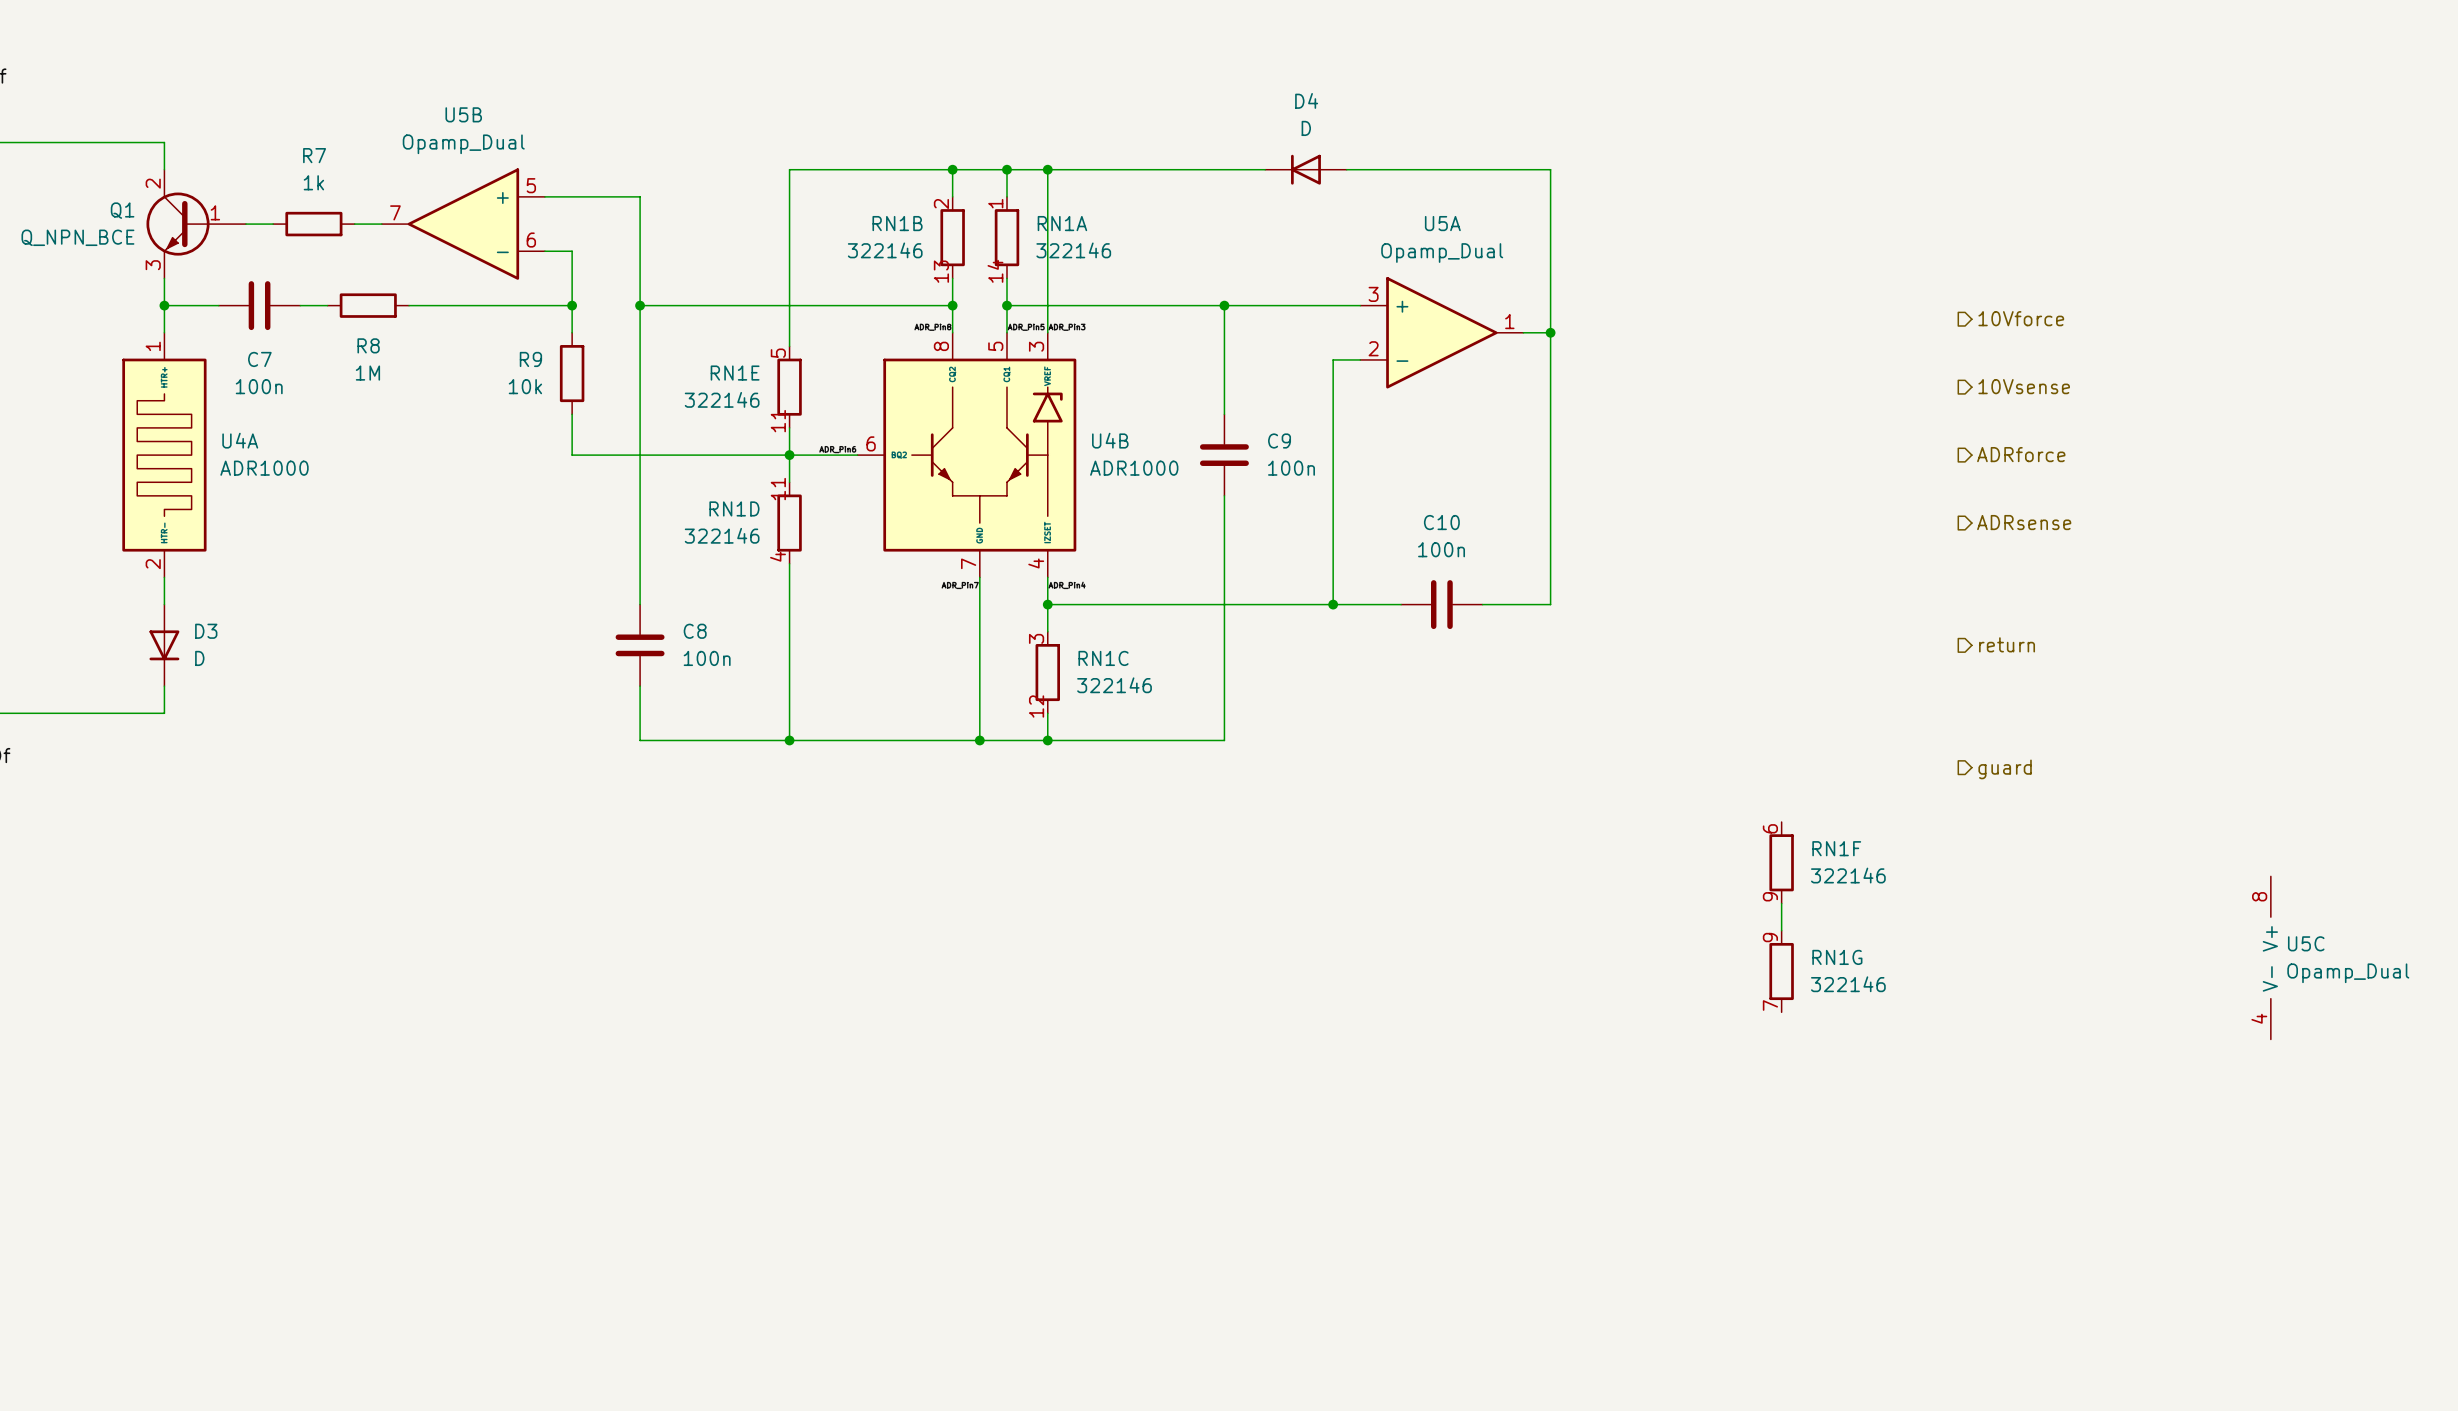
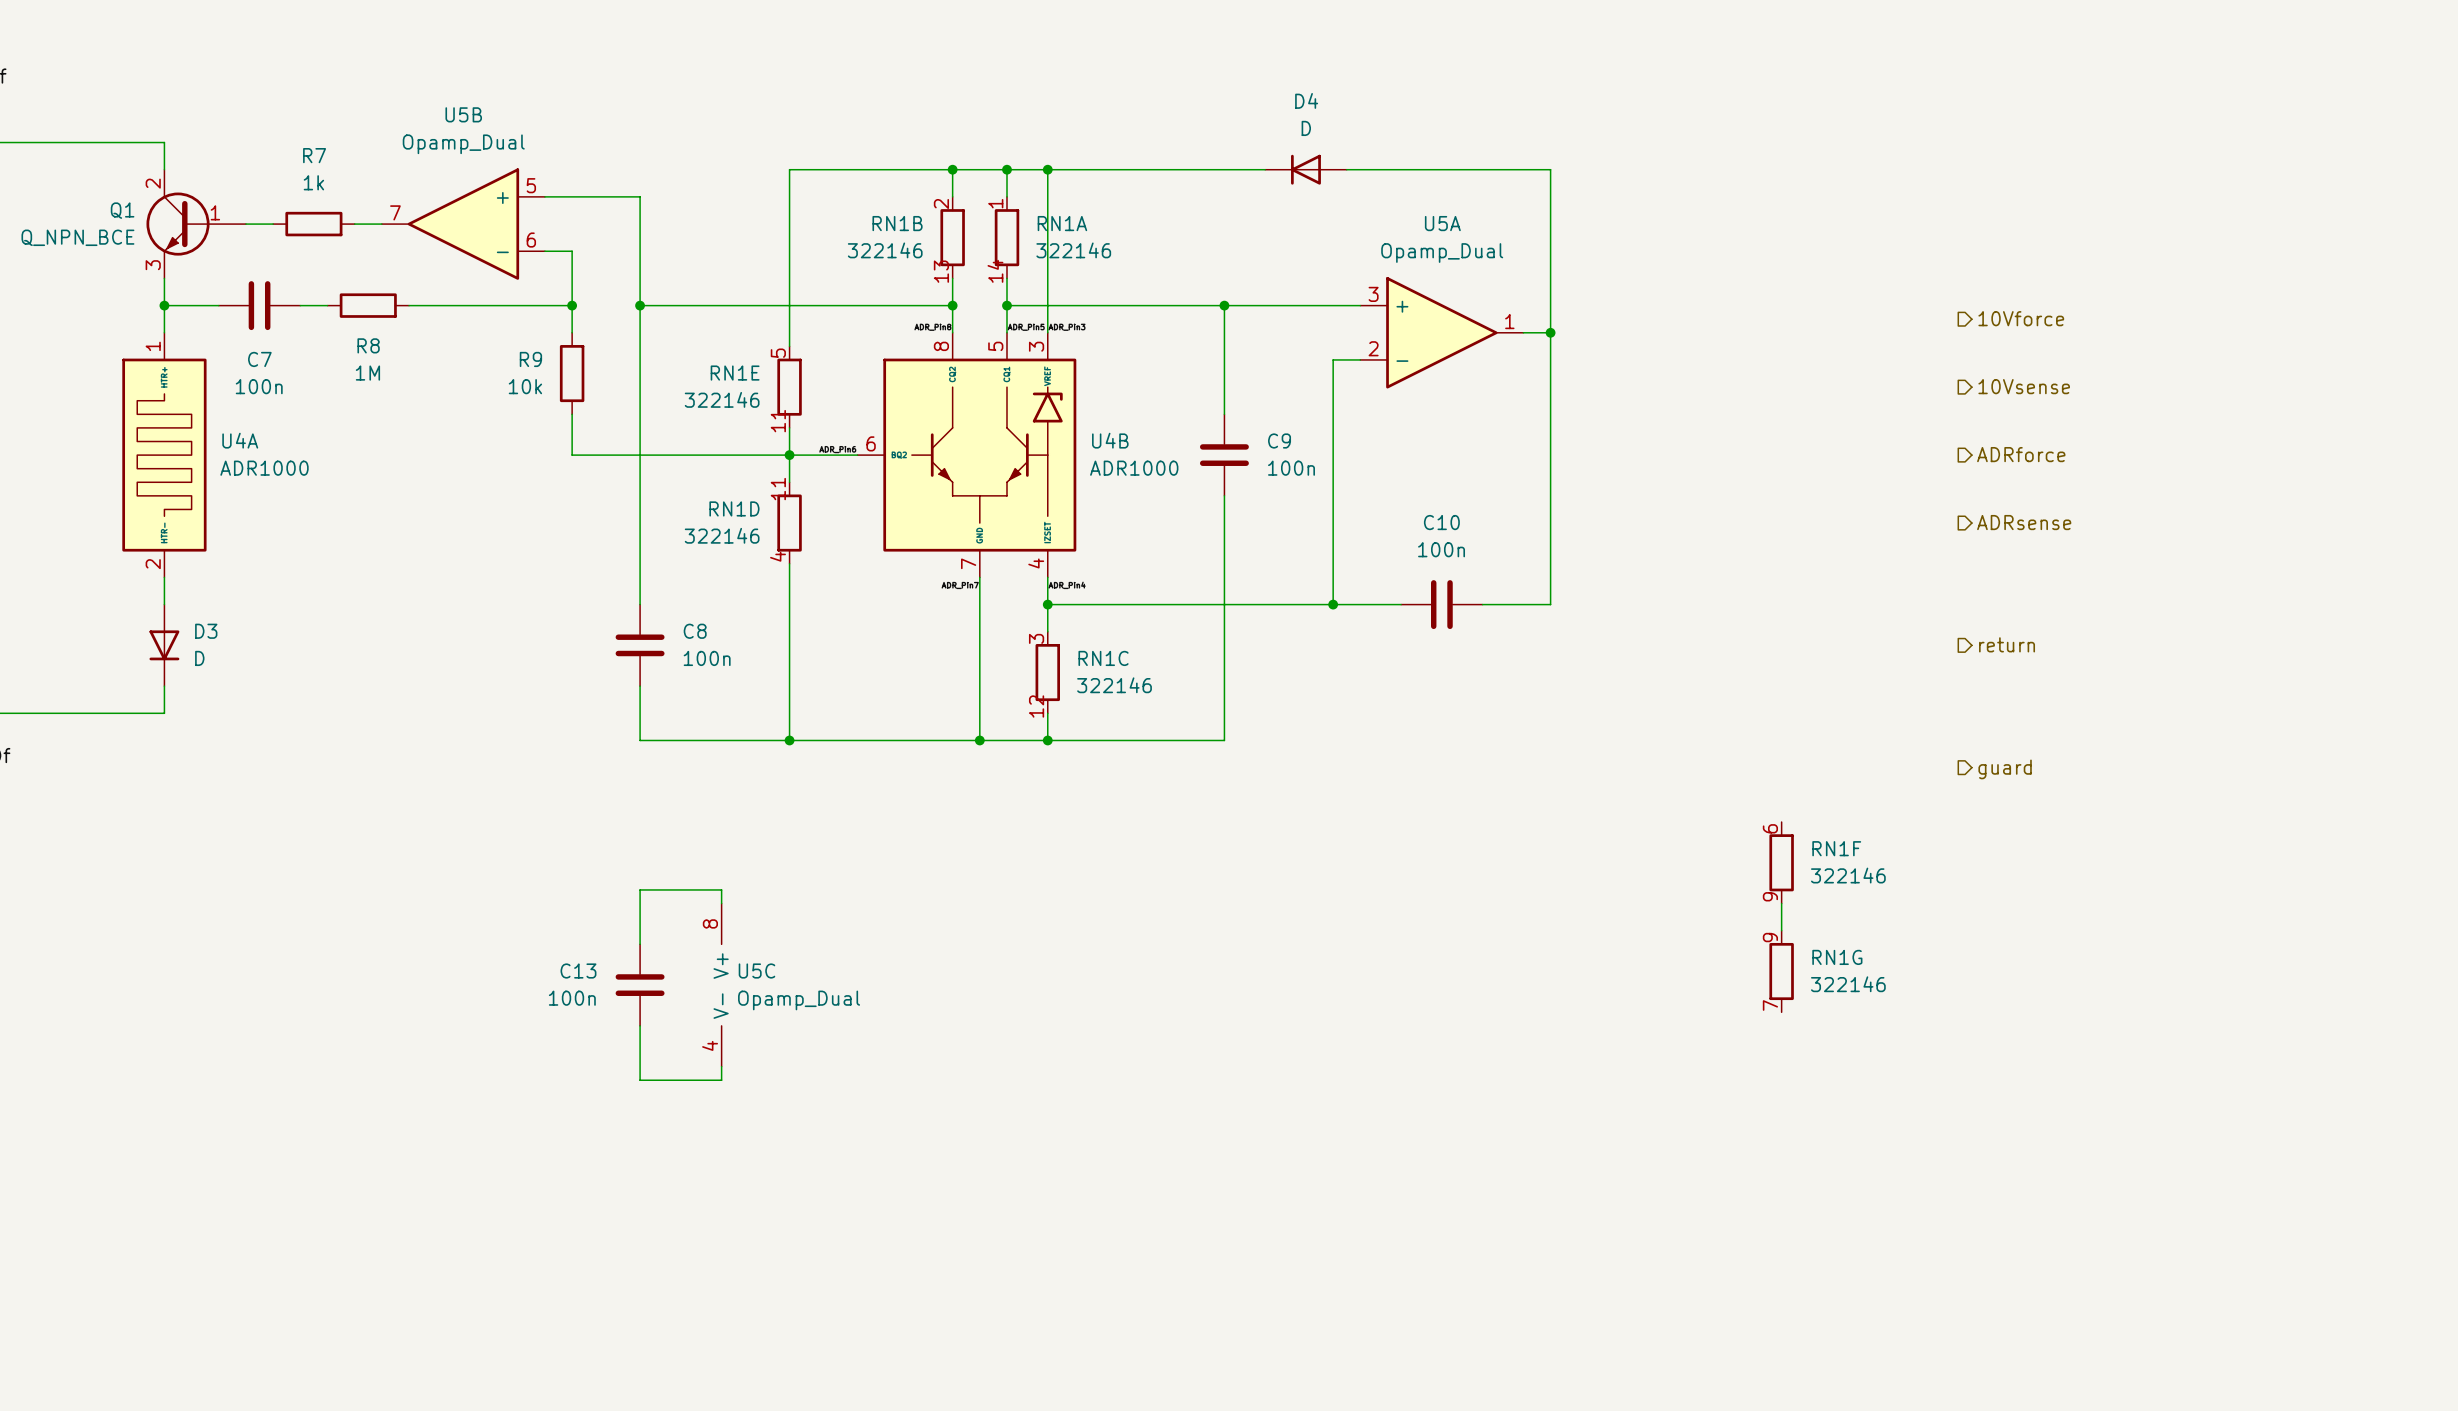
wire: none -> (721, 903) (721, 889) (640, 889) (640, 944)
U5C position: (2270, 957) -> (721, 985)
C13: none -> 100n (640, 985)
wire: none -> (640, 1025) (640, 1080) (721, 1080) (721, 1066)

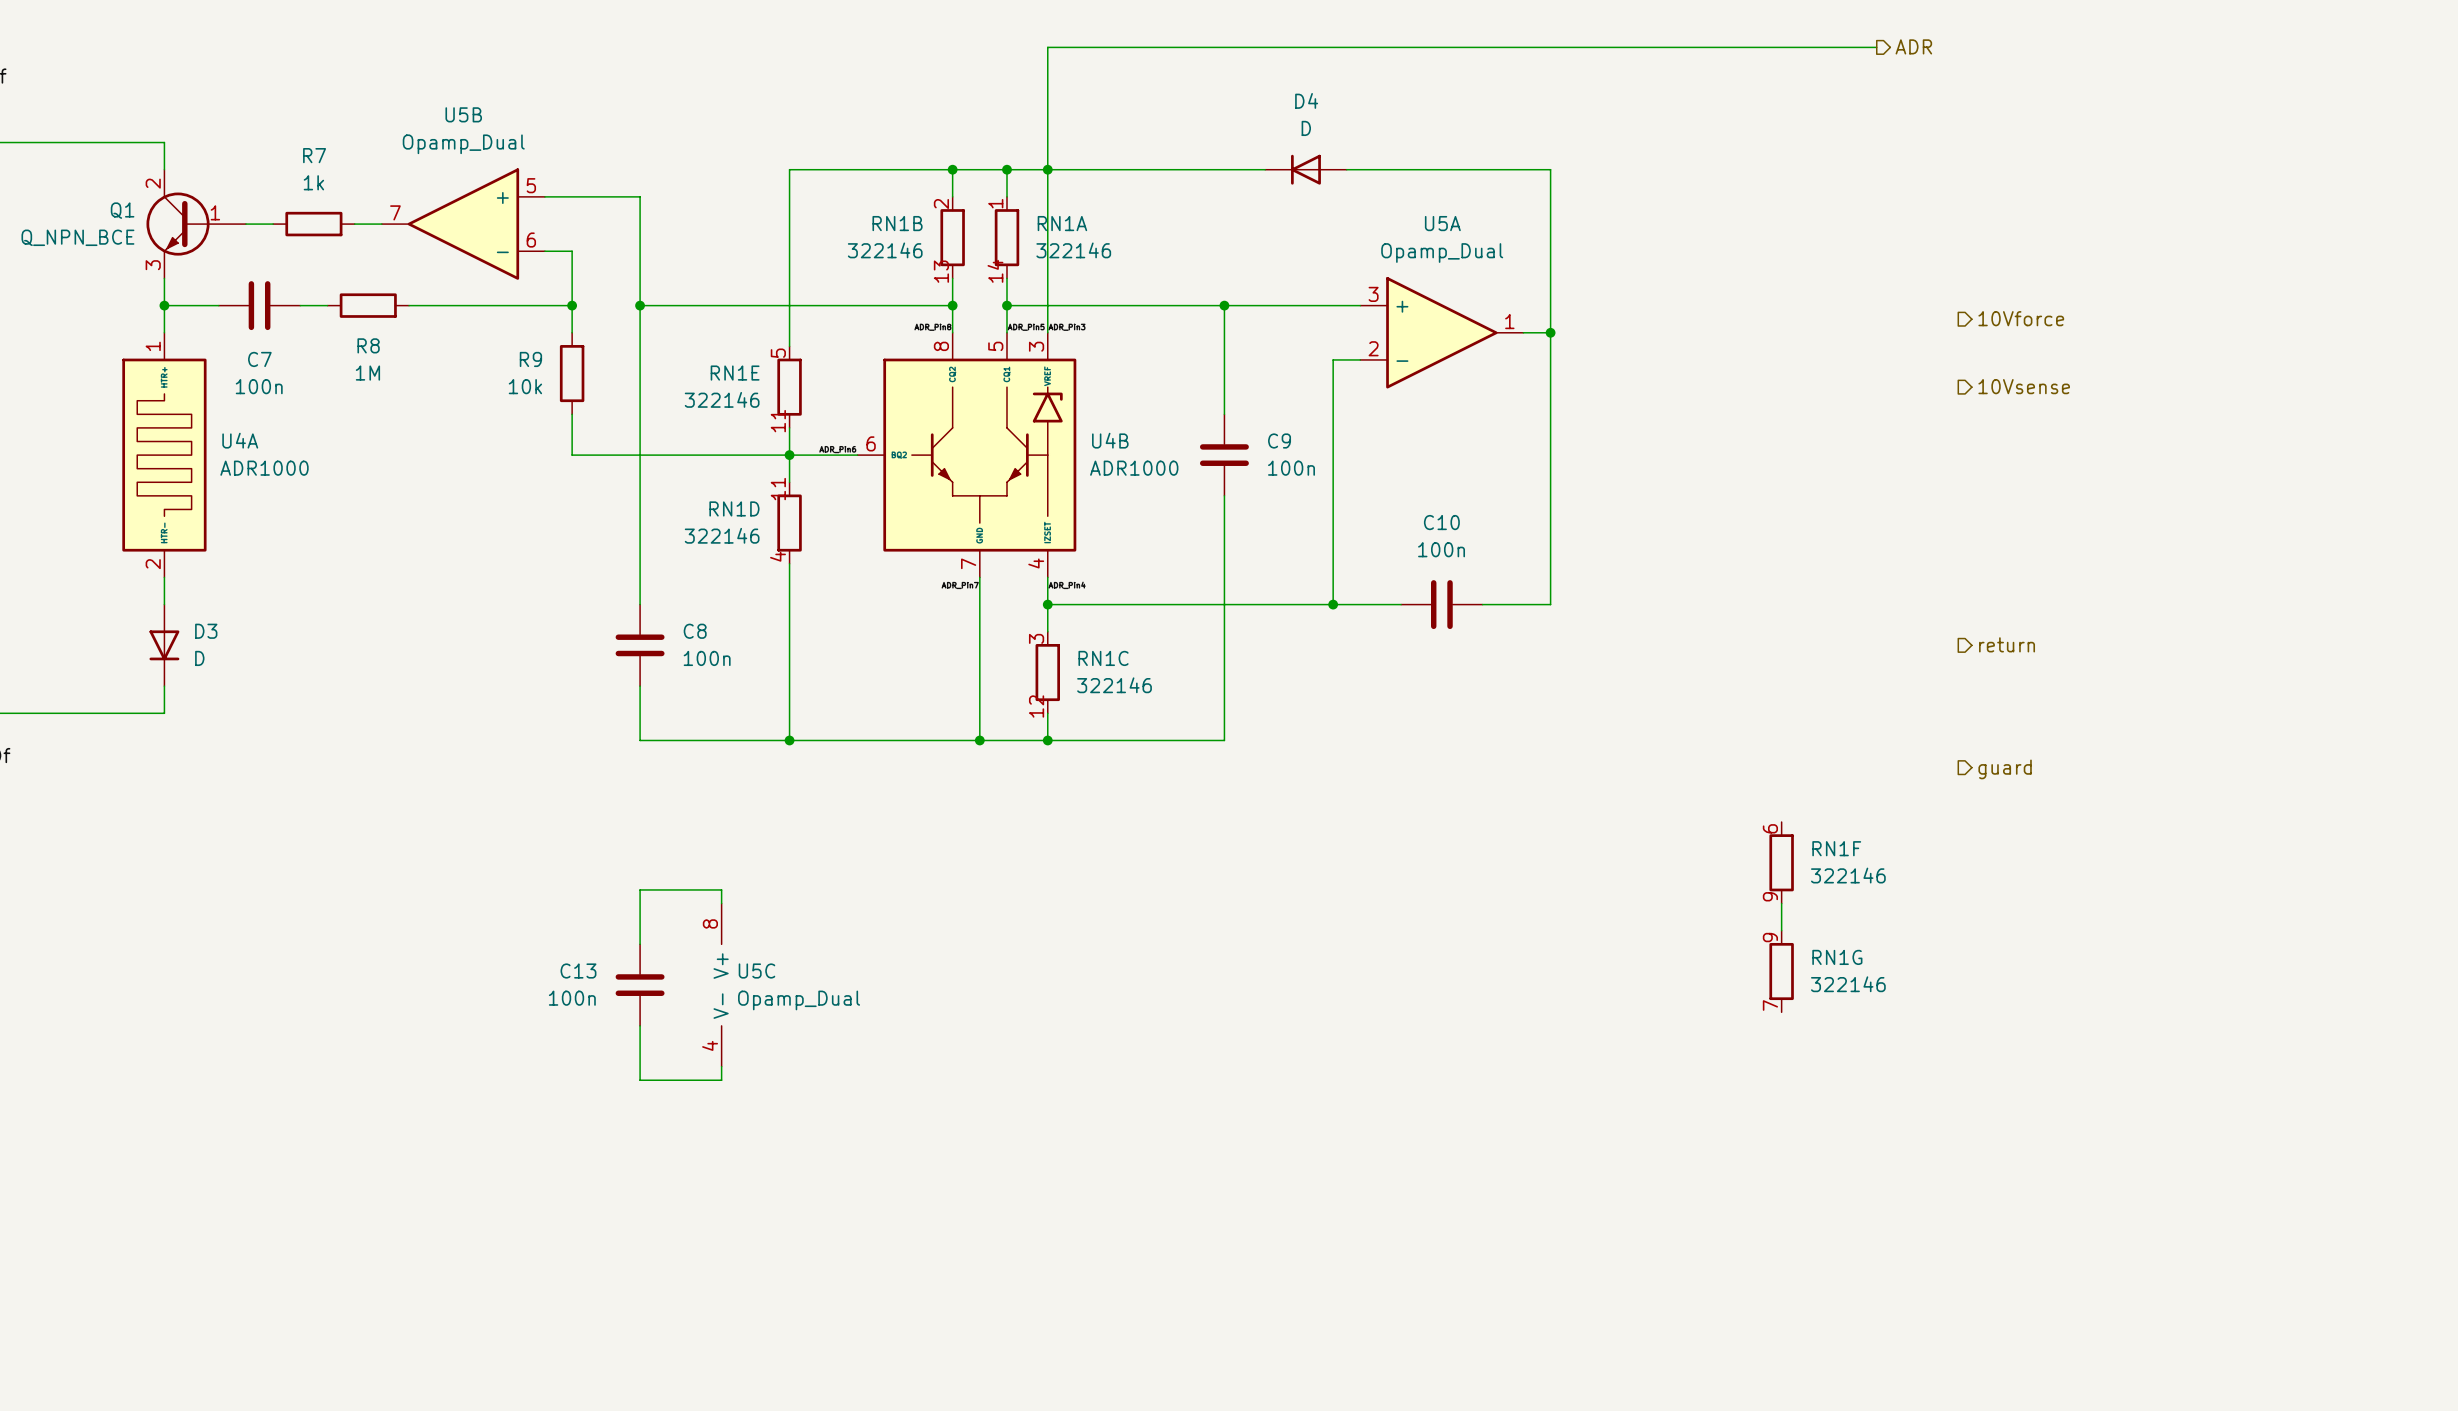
hierarchical label: none -> ADR (1913, 46)
wire: none -> (1876, 47) (1047, 47) (1047, 169)
hierarchical label: ADRforce (2021, 454) -> none
hierarchical label: ADRsense (2024, 522) -> none

